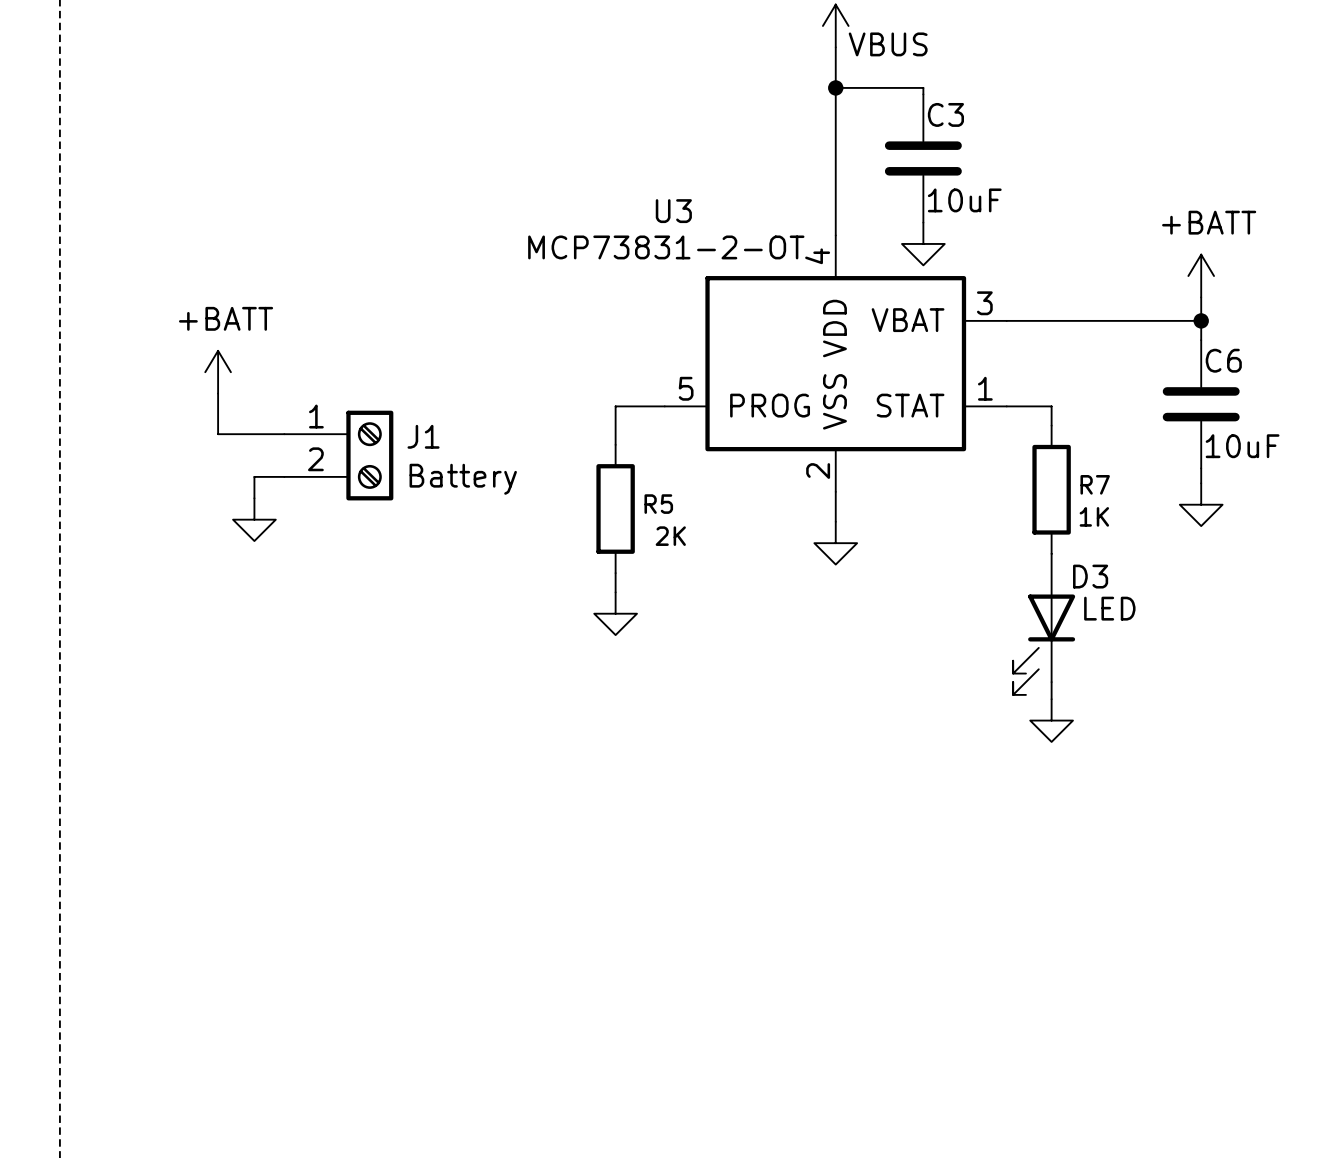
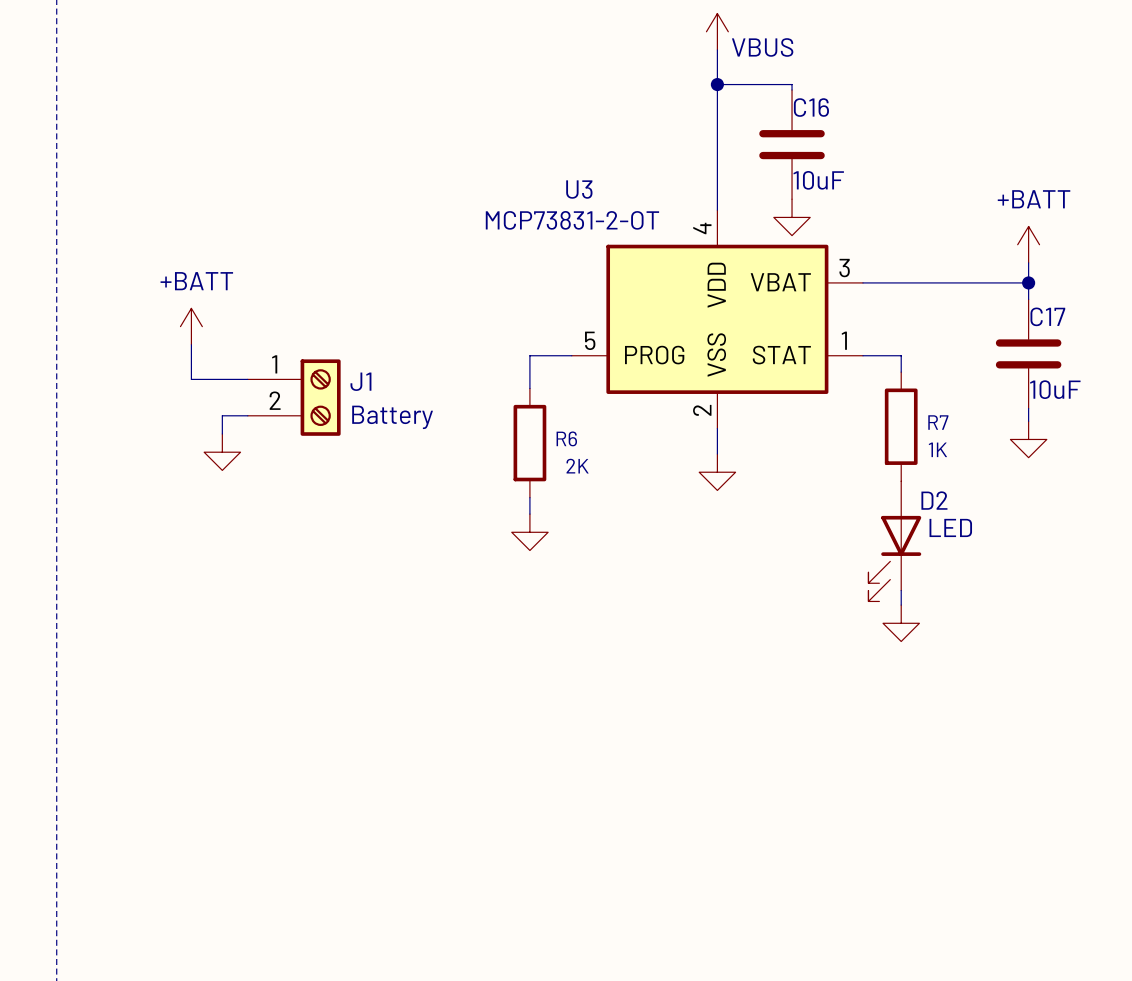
C3 name: C3 (945, 114) -> C16 (811, 107)
C6 name: C6 (1223, 360) -> C17 (1047, 316)
R5 name: R5 (658, 504) -> R6 (566, 438)
D3 name: D3 (1090, 576) -> D2 (934, 500)

